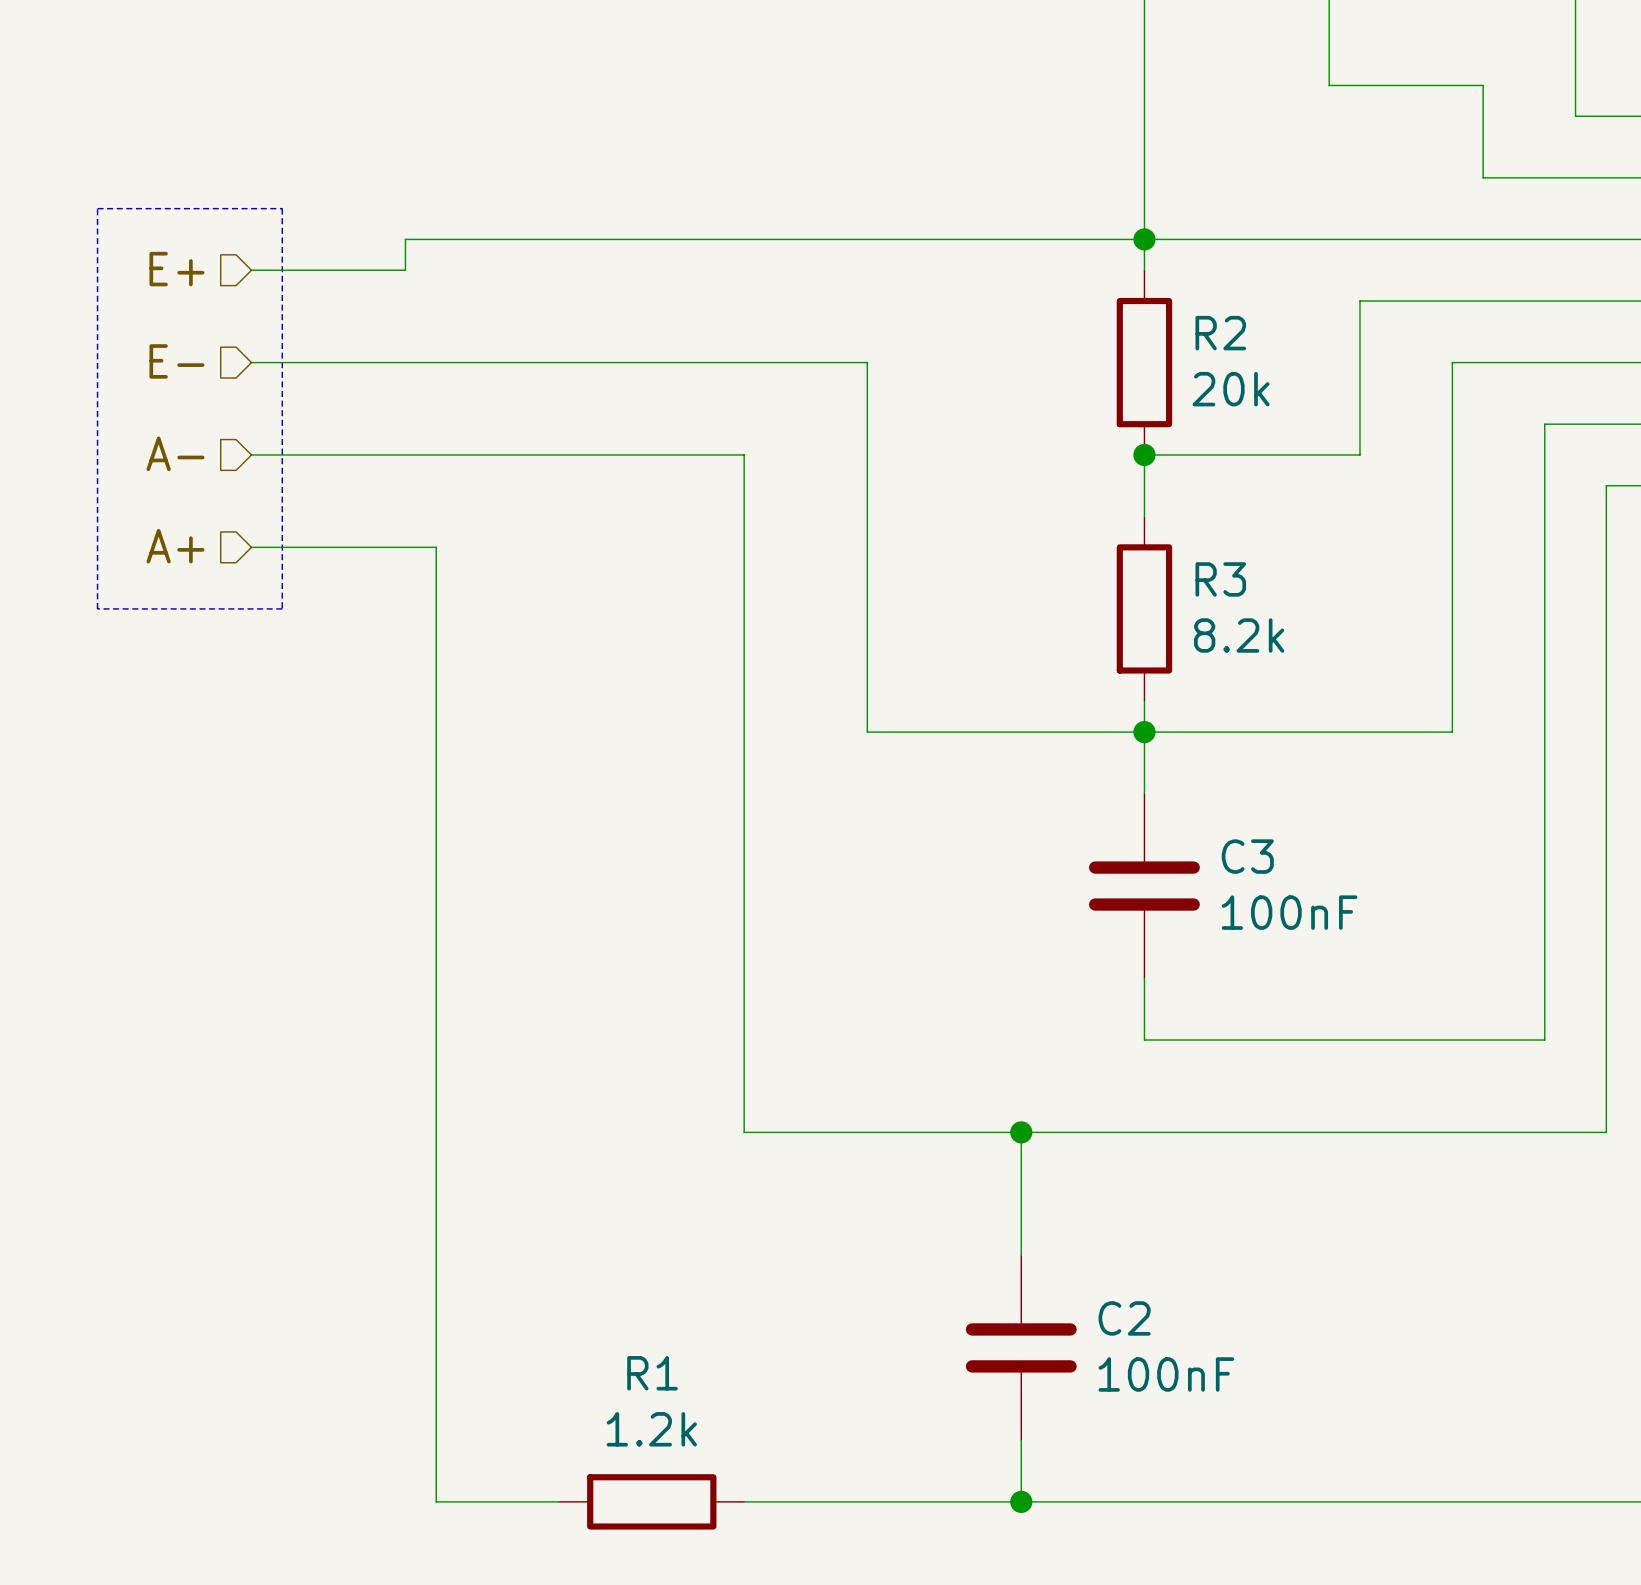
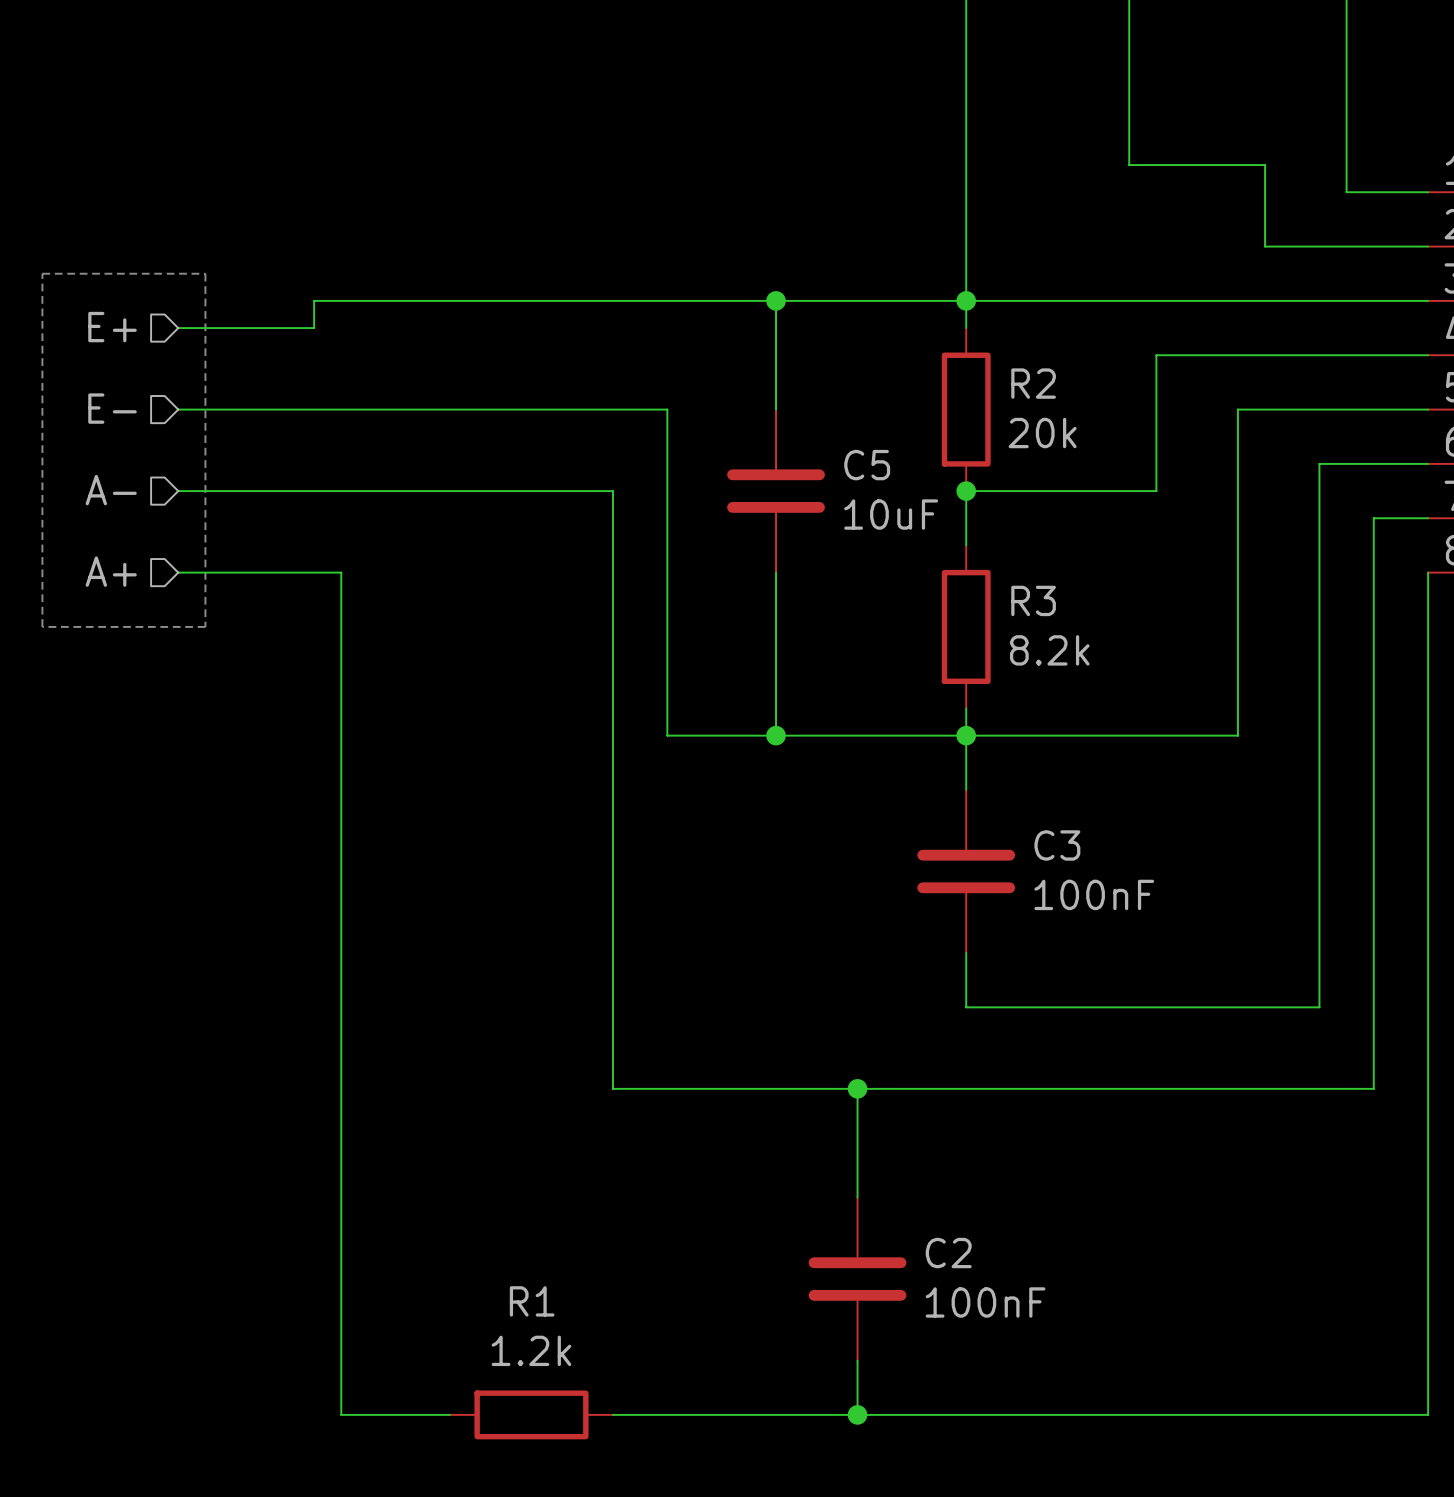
wire: none -> (776, 300) (776, 409)
junction: none -> (776, 300)
wire: (805, 362) (867, 362) (867, 732) -> (667, 409) (667, 735) (721, 735)
C5: none -> 10uF (776, 491)
wire: none -> (776, 572) (776, 735)
junction: none -> (776, 735)

